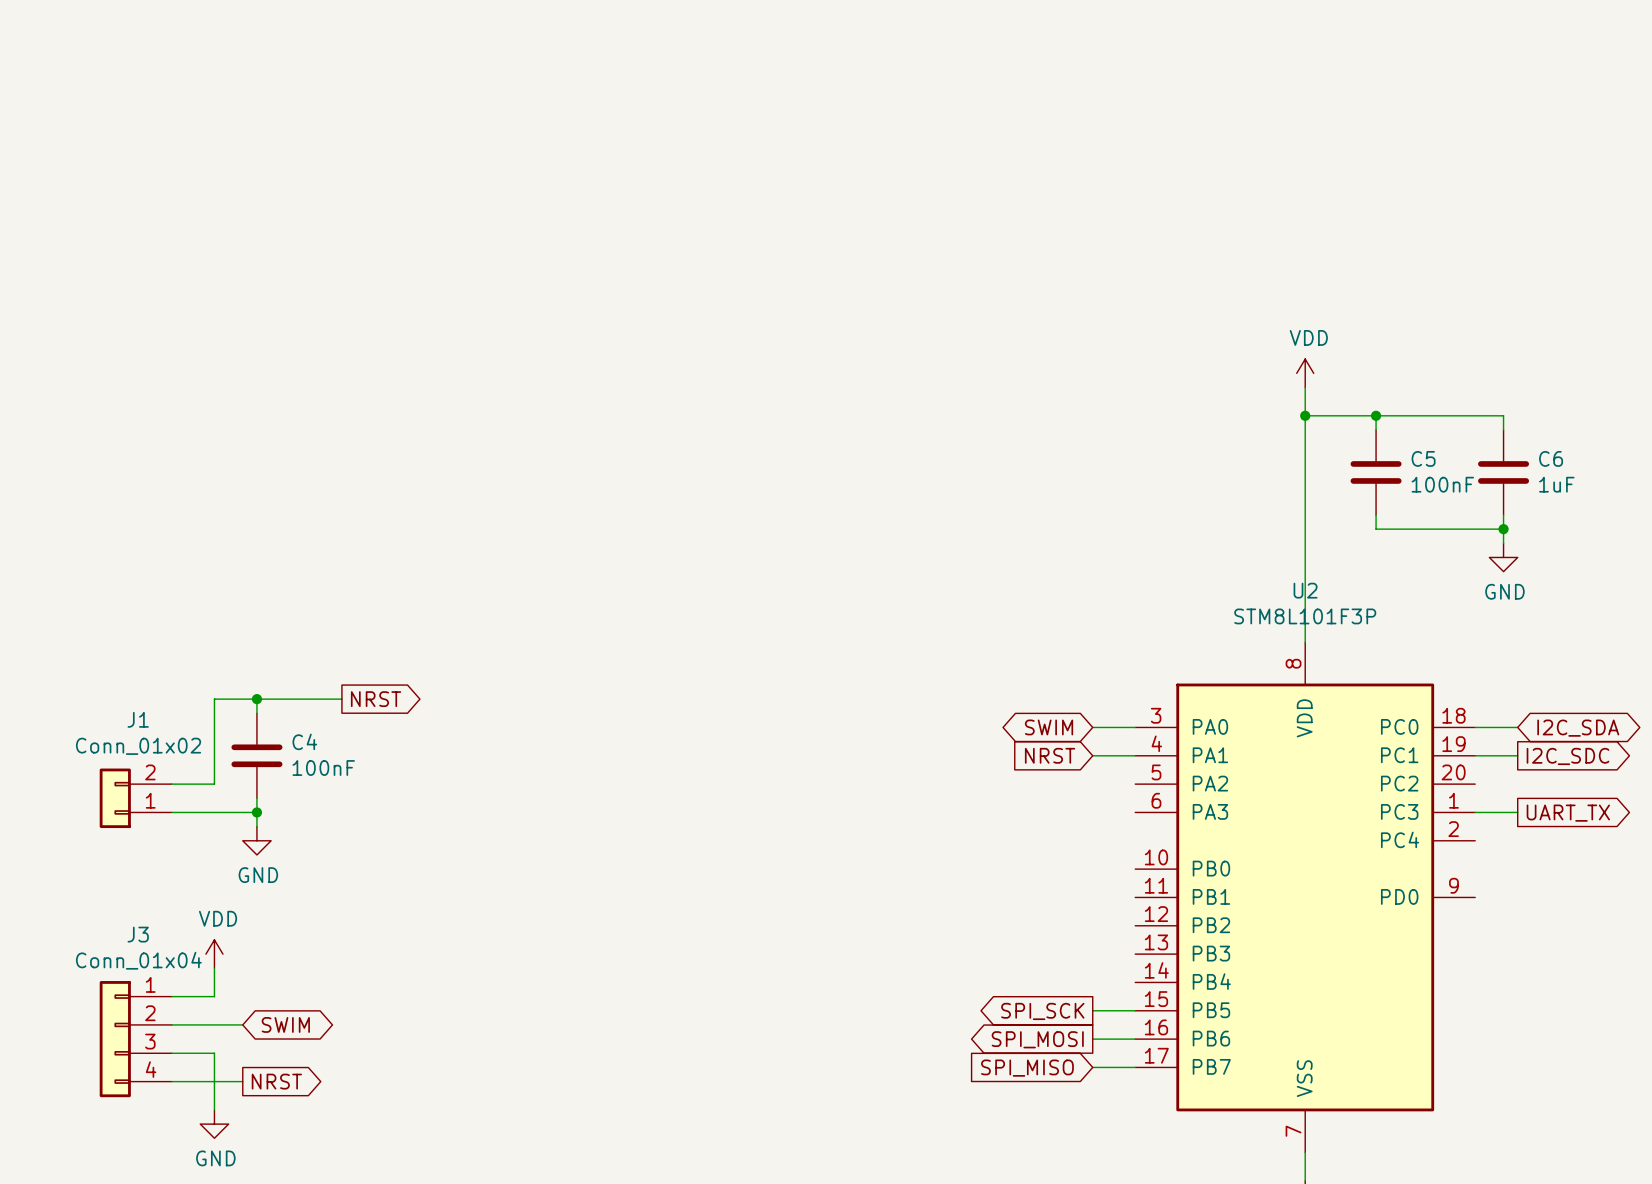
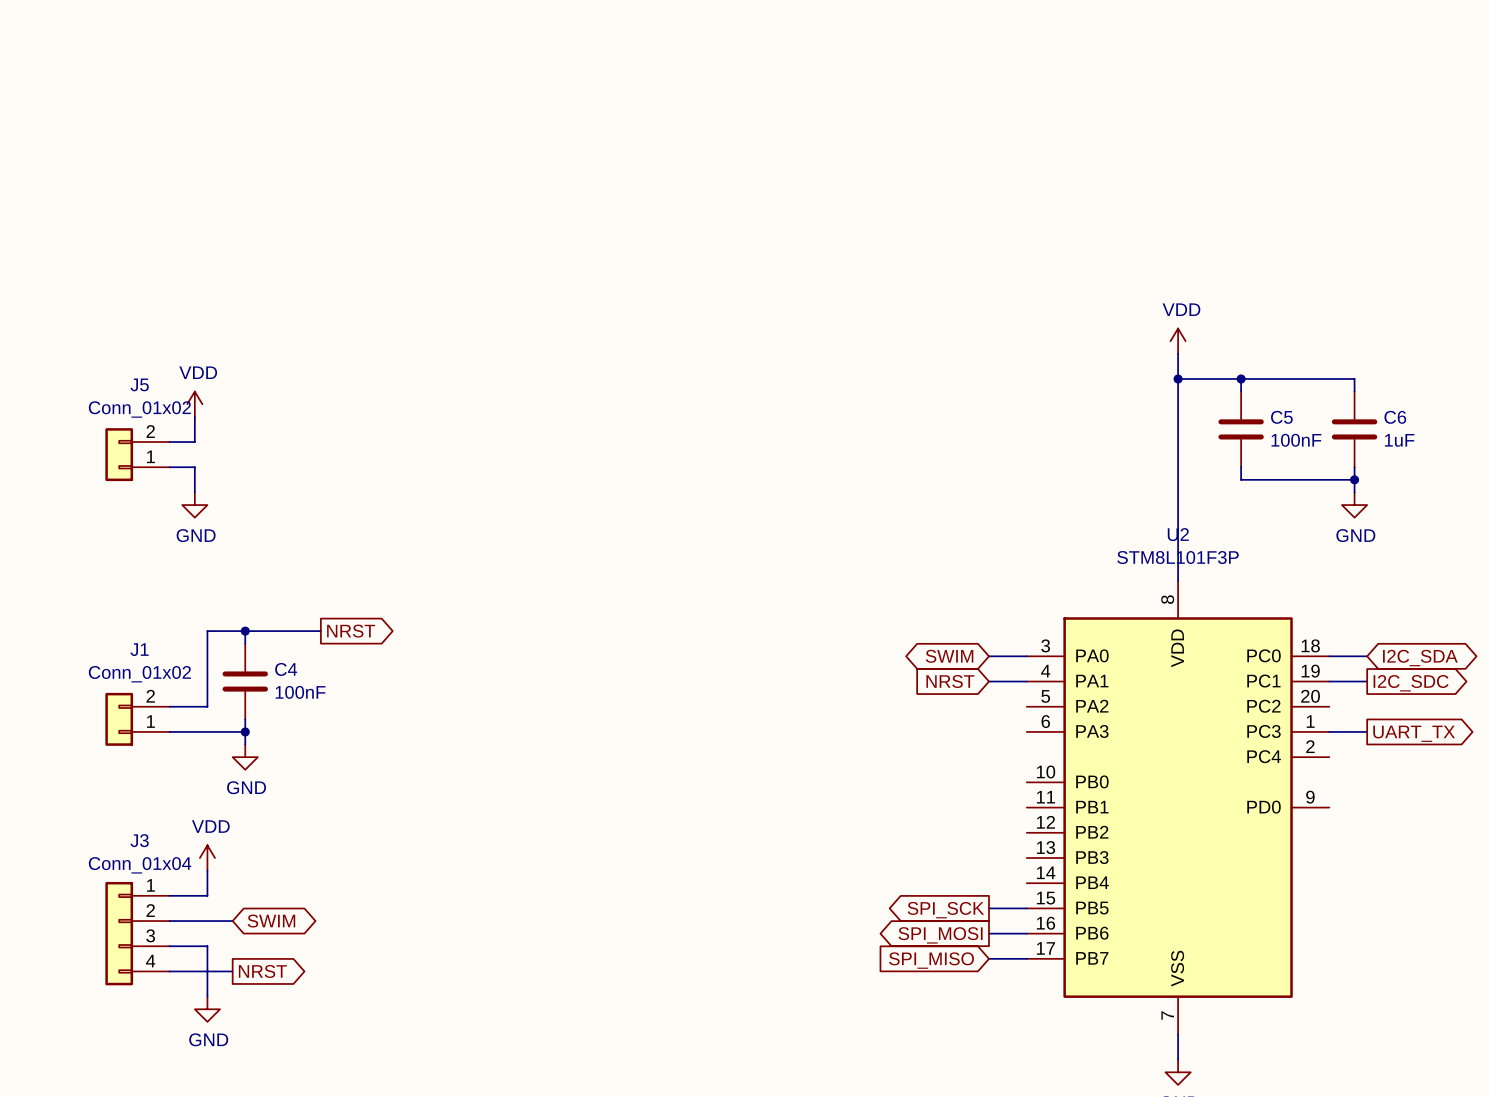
power symbol: none -> VDD (194, 404)
wire: none -> (194, 416) (194, 442) (169, 442)
J5: none -> Conn_01x02 (137, 454)
wire: none -> (169, 467) (194, 467) (194, 492)
power symbol: none -> GND (194, 505)

